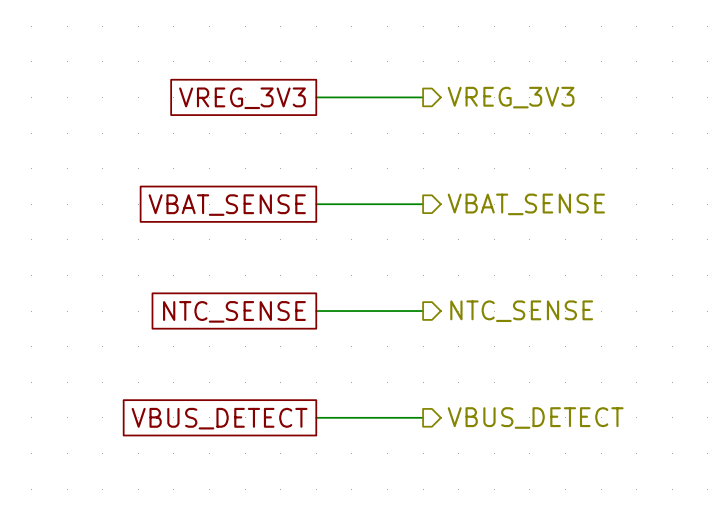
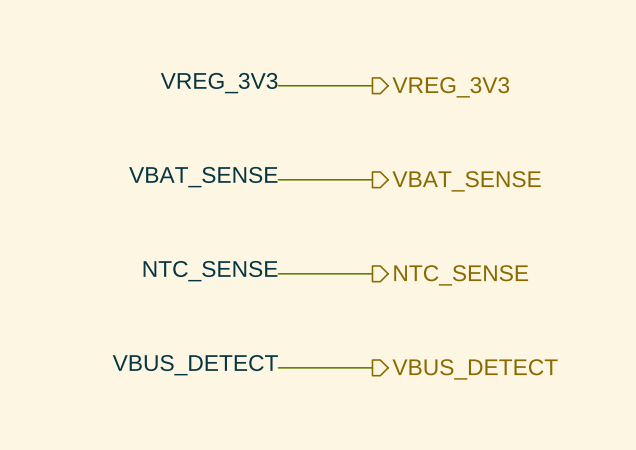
label: none -> VREG_3V3 (219, 83)
global label: VREG_3V3 (242, 98) -> none
label: none -> VBAT_SENSE (203, 177)
global label: VBAT_SENSE (227, 205) -> none
label: none -> NTC_SENSE (210, 271)
global label: NTC_SENSE (234, 311) -> none
label: none -> VBUS_DETECT (195, 365)
global label: VBUS_DETECT (219, 418) -> none

